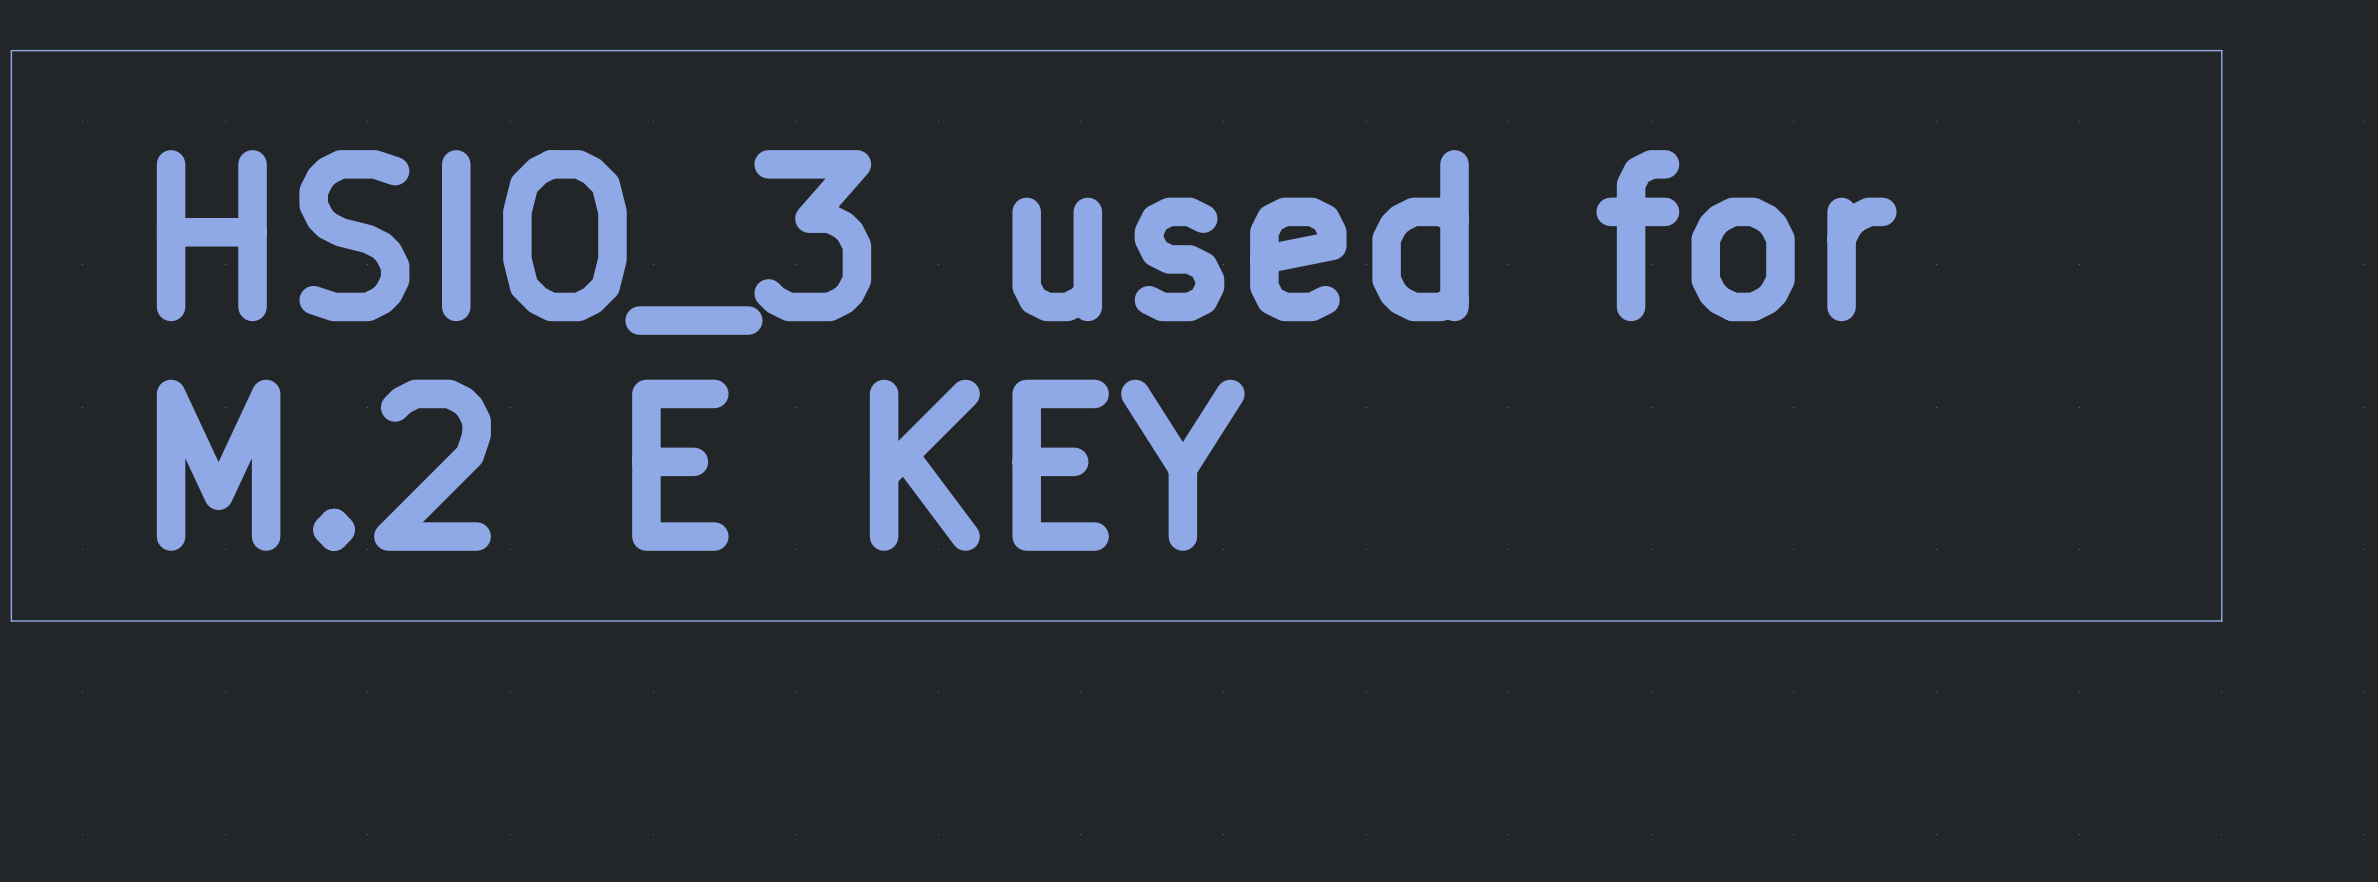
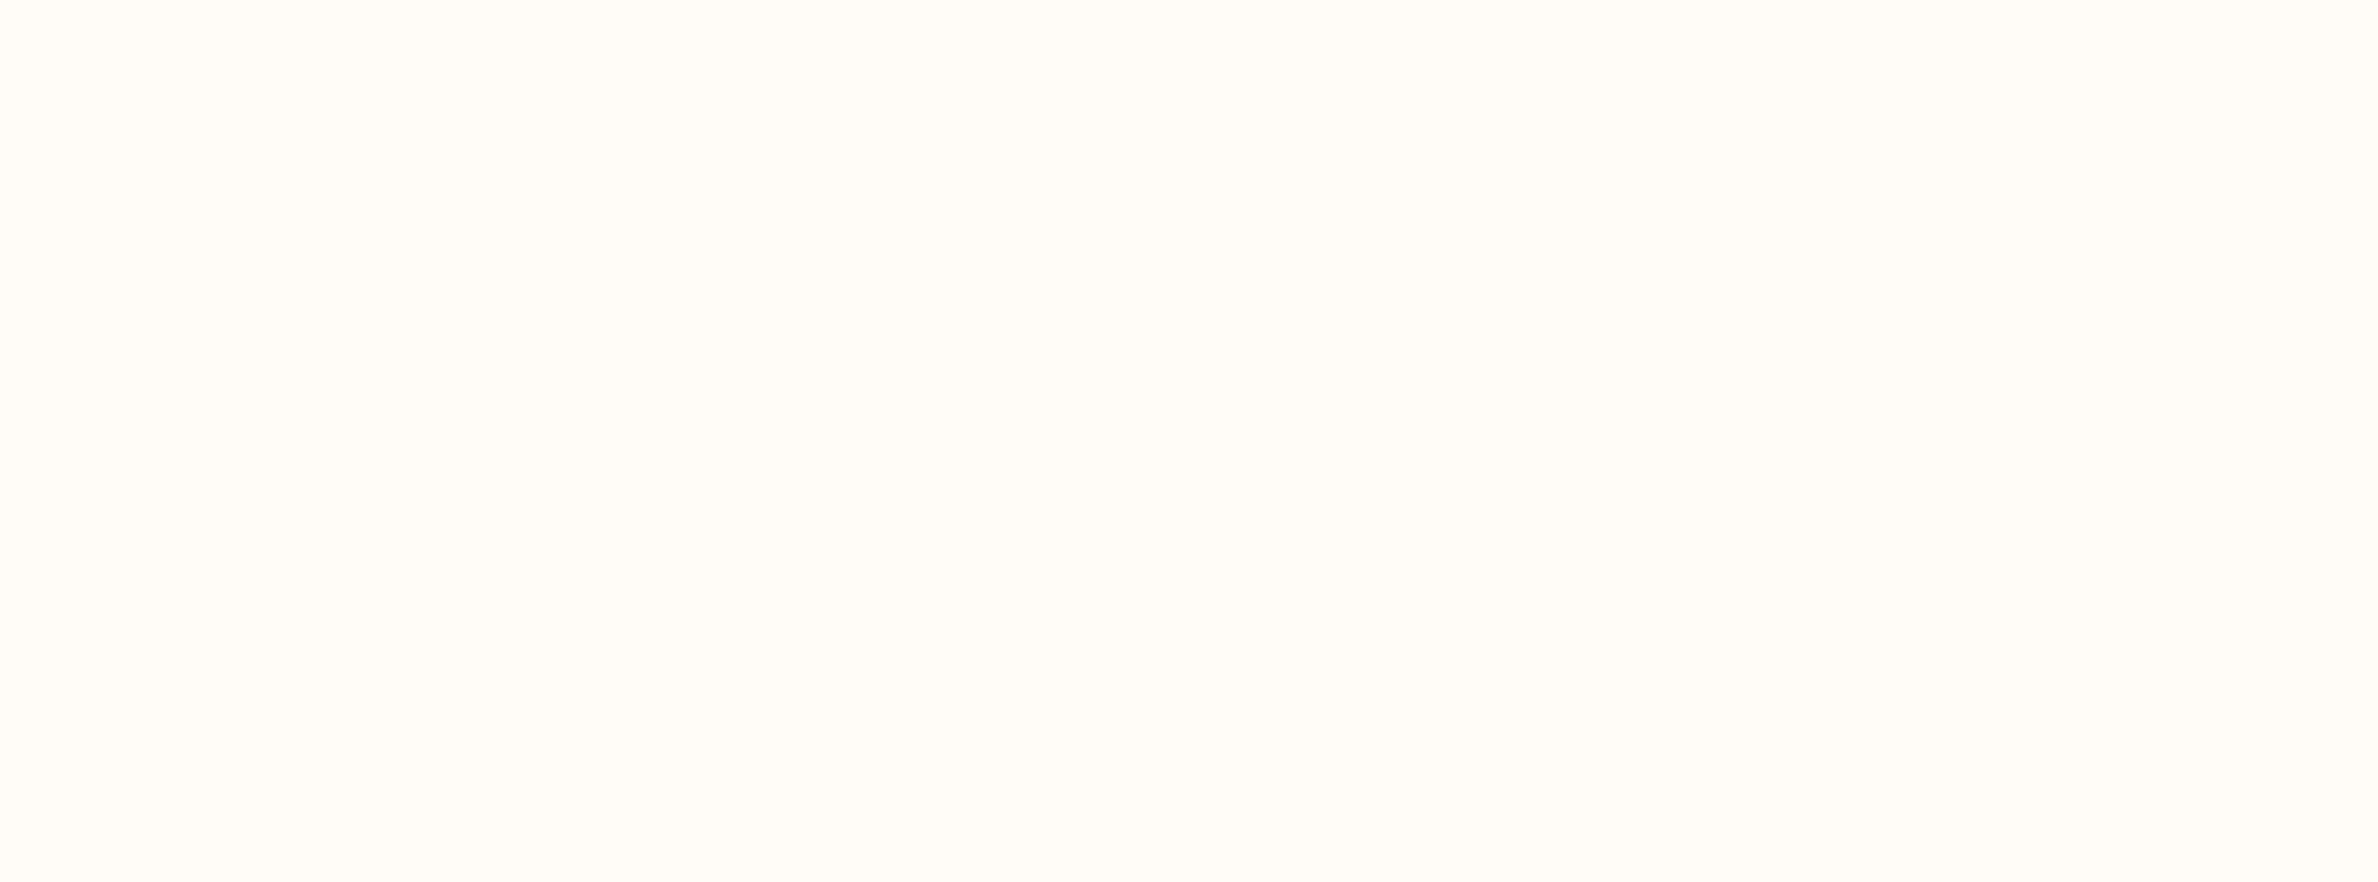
line: (11, 50) (11, 621) (2221, 621) (2221, 50) (11, 50) -> none
text: HSIO_3 used for (1026, 242) -> none
text: M.2 E KEY (700, 465) -> none

